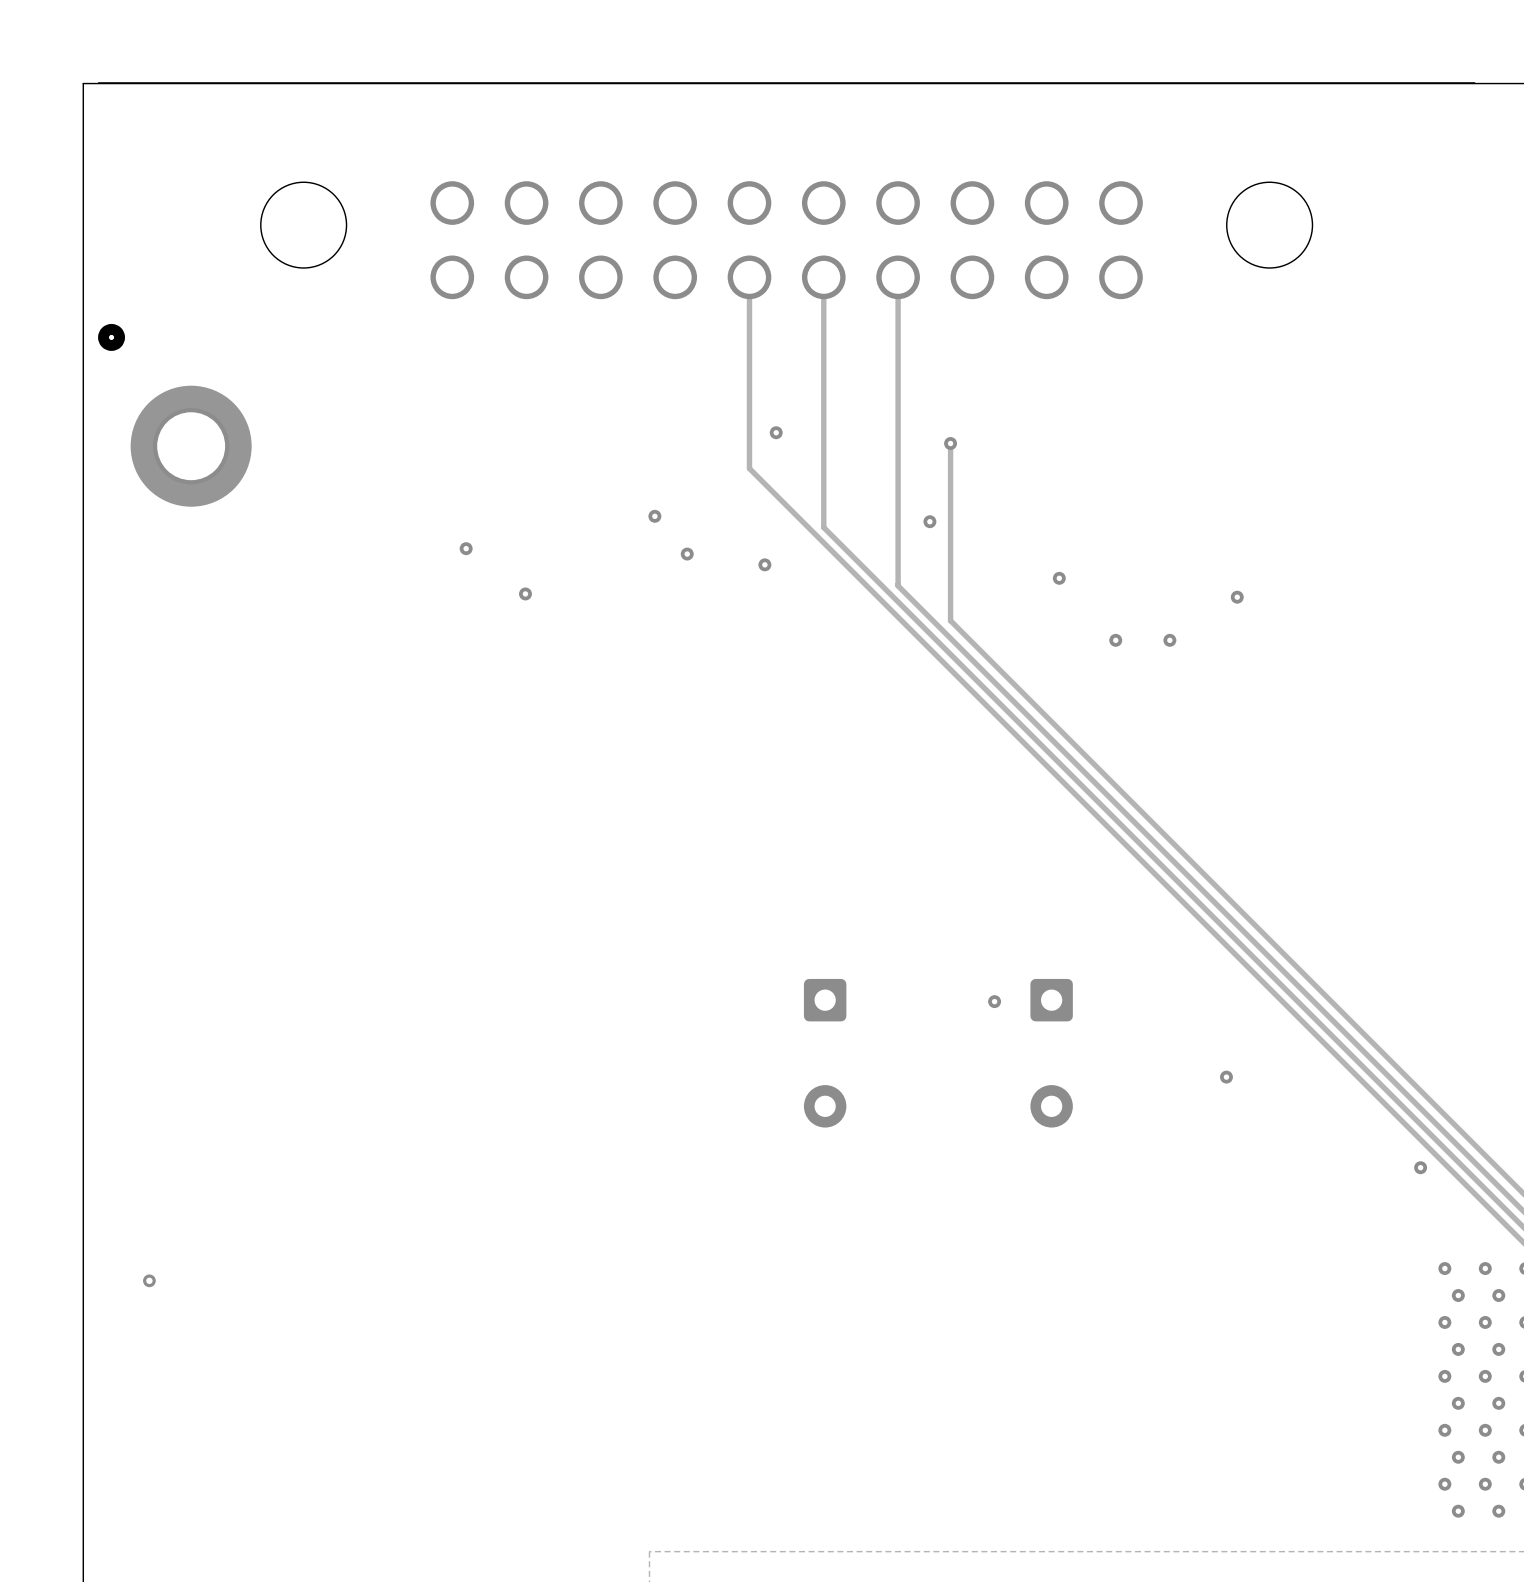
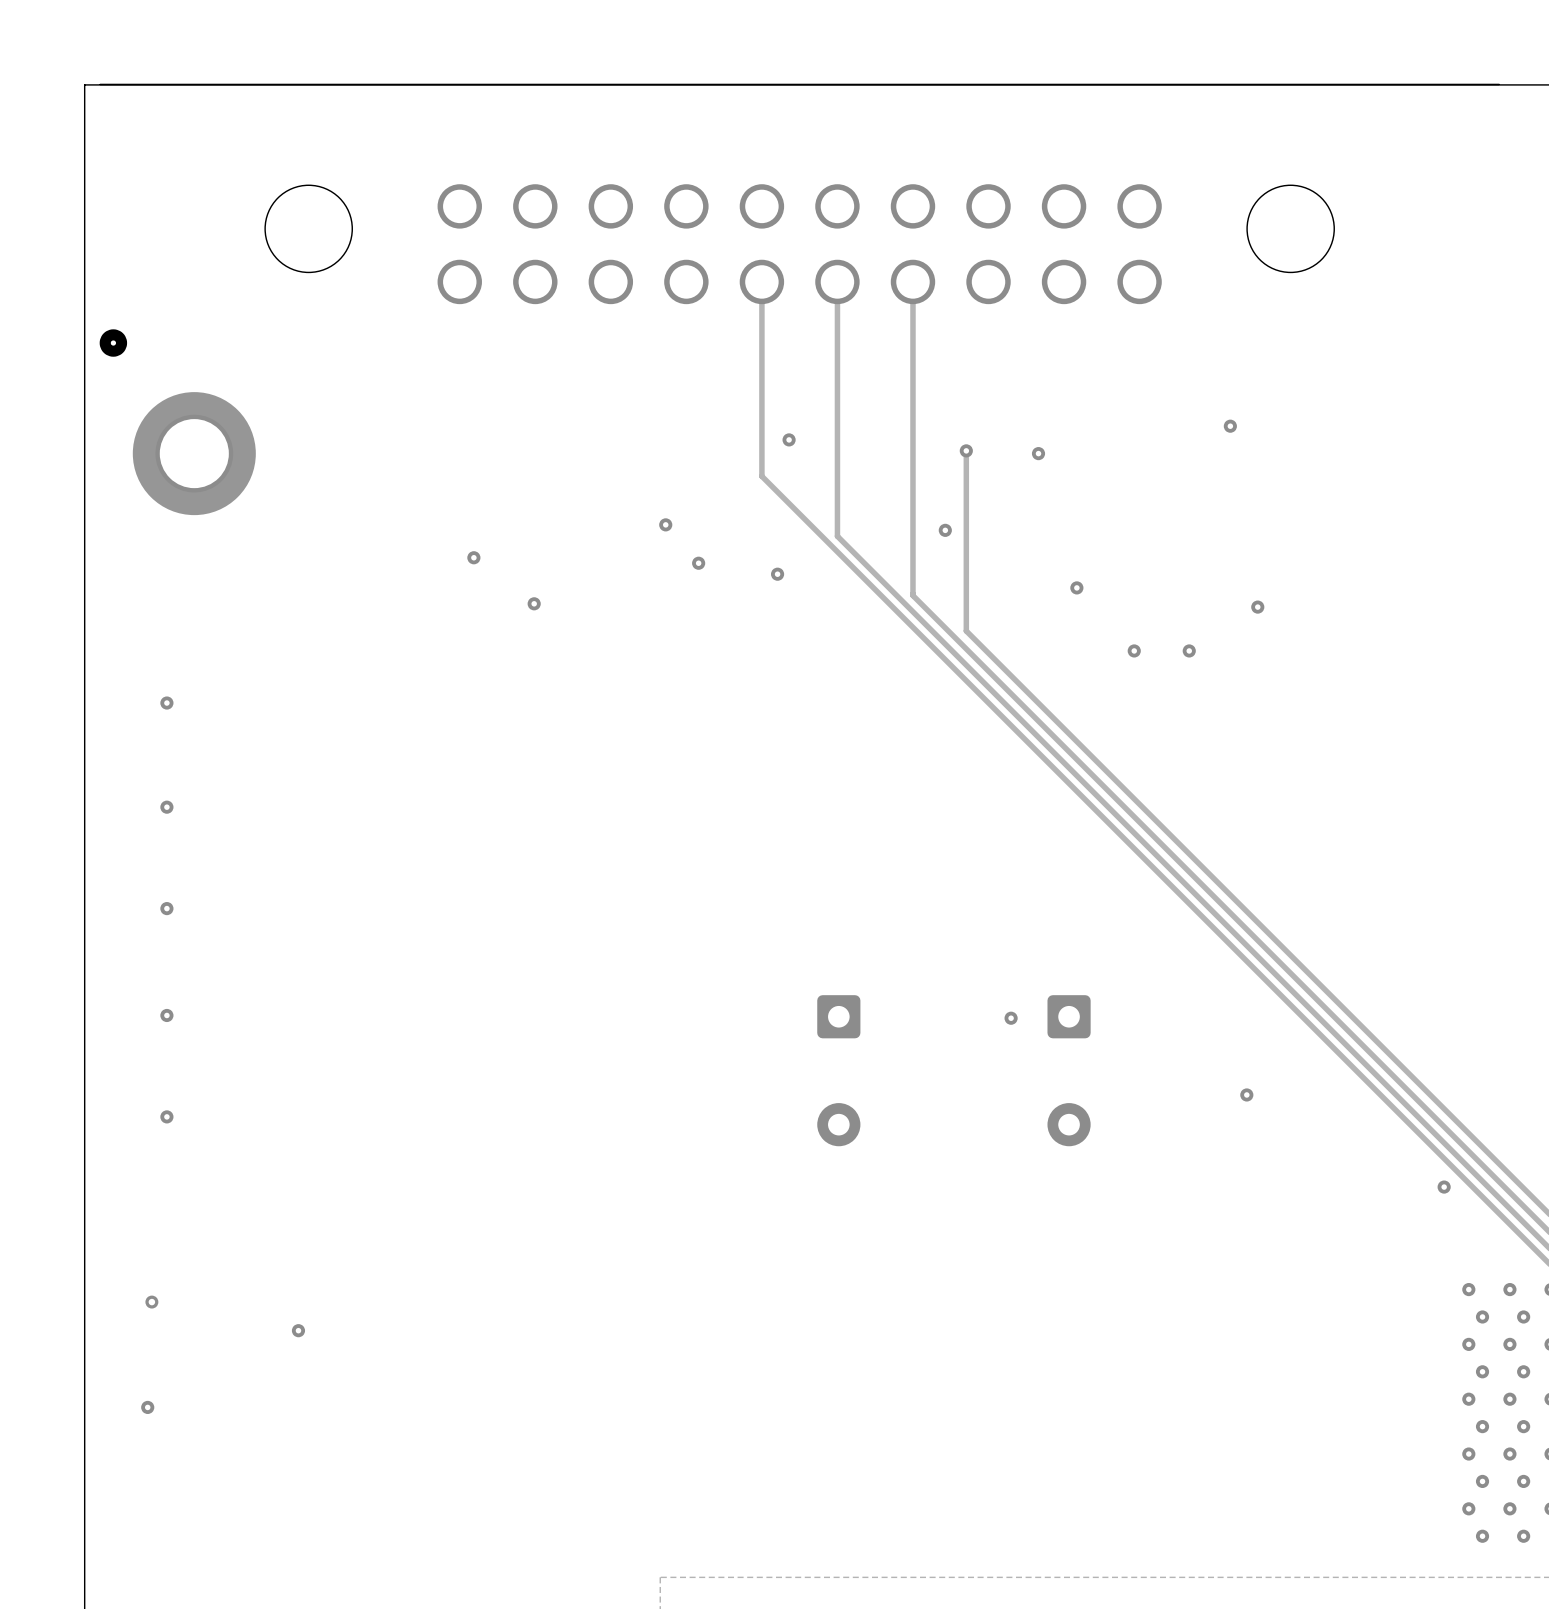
via: none -> (1230, 426)
via: none -> (1038, 453)
via: none -> (166, 703)
via: none -> (166, 807)
via: none -> (166, 908)
via: none -> (166, 1015)
via: none -> (166, 1116)
via: none -> (298, 1330)
via: none -> (147, 1407)

